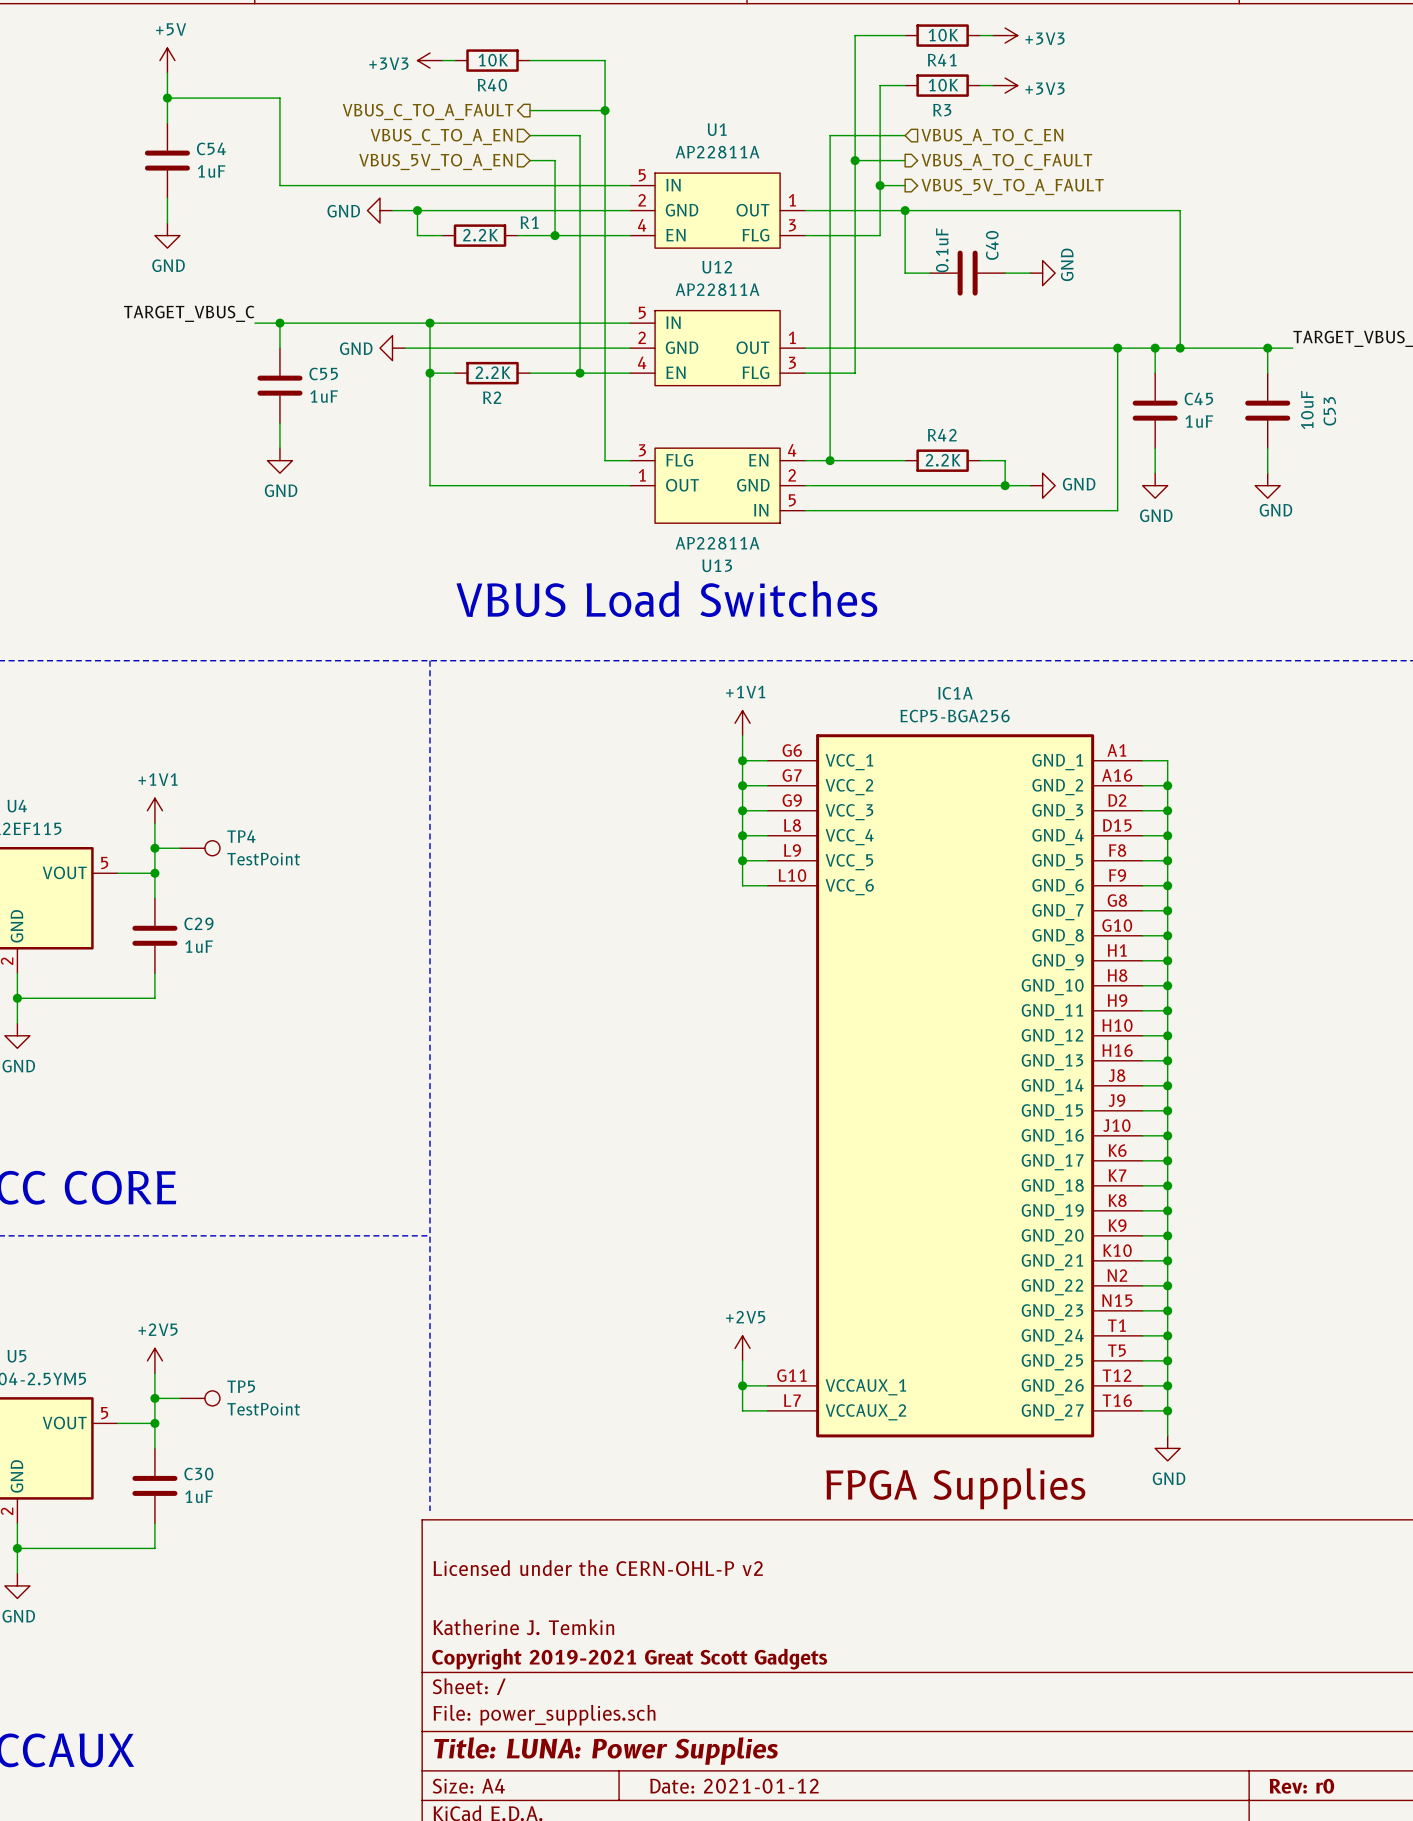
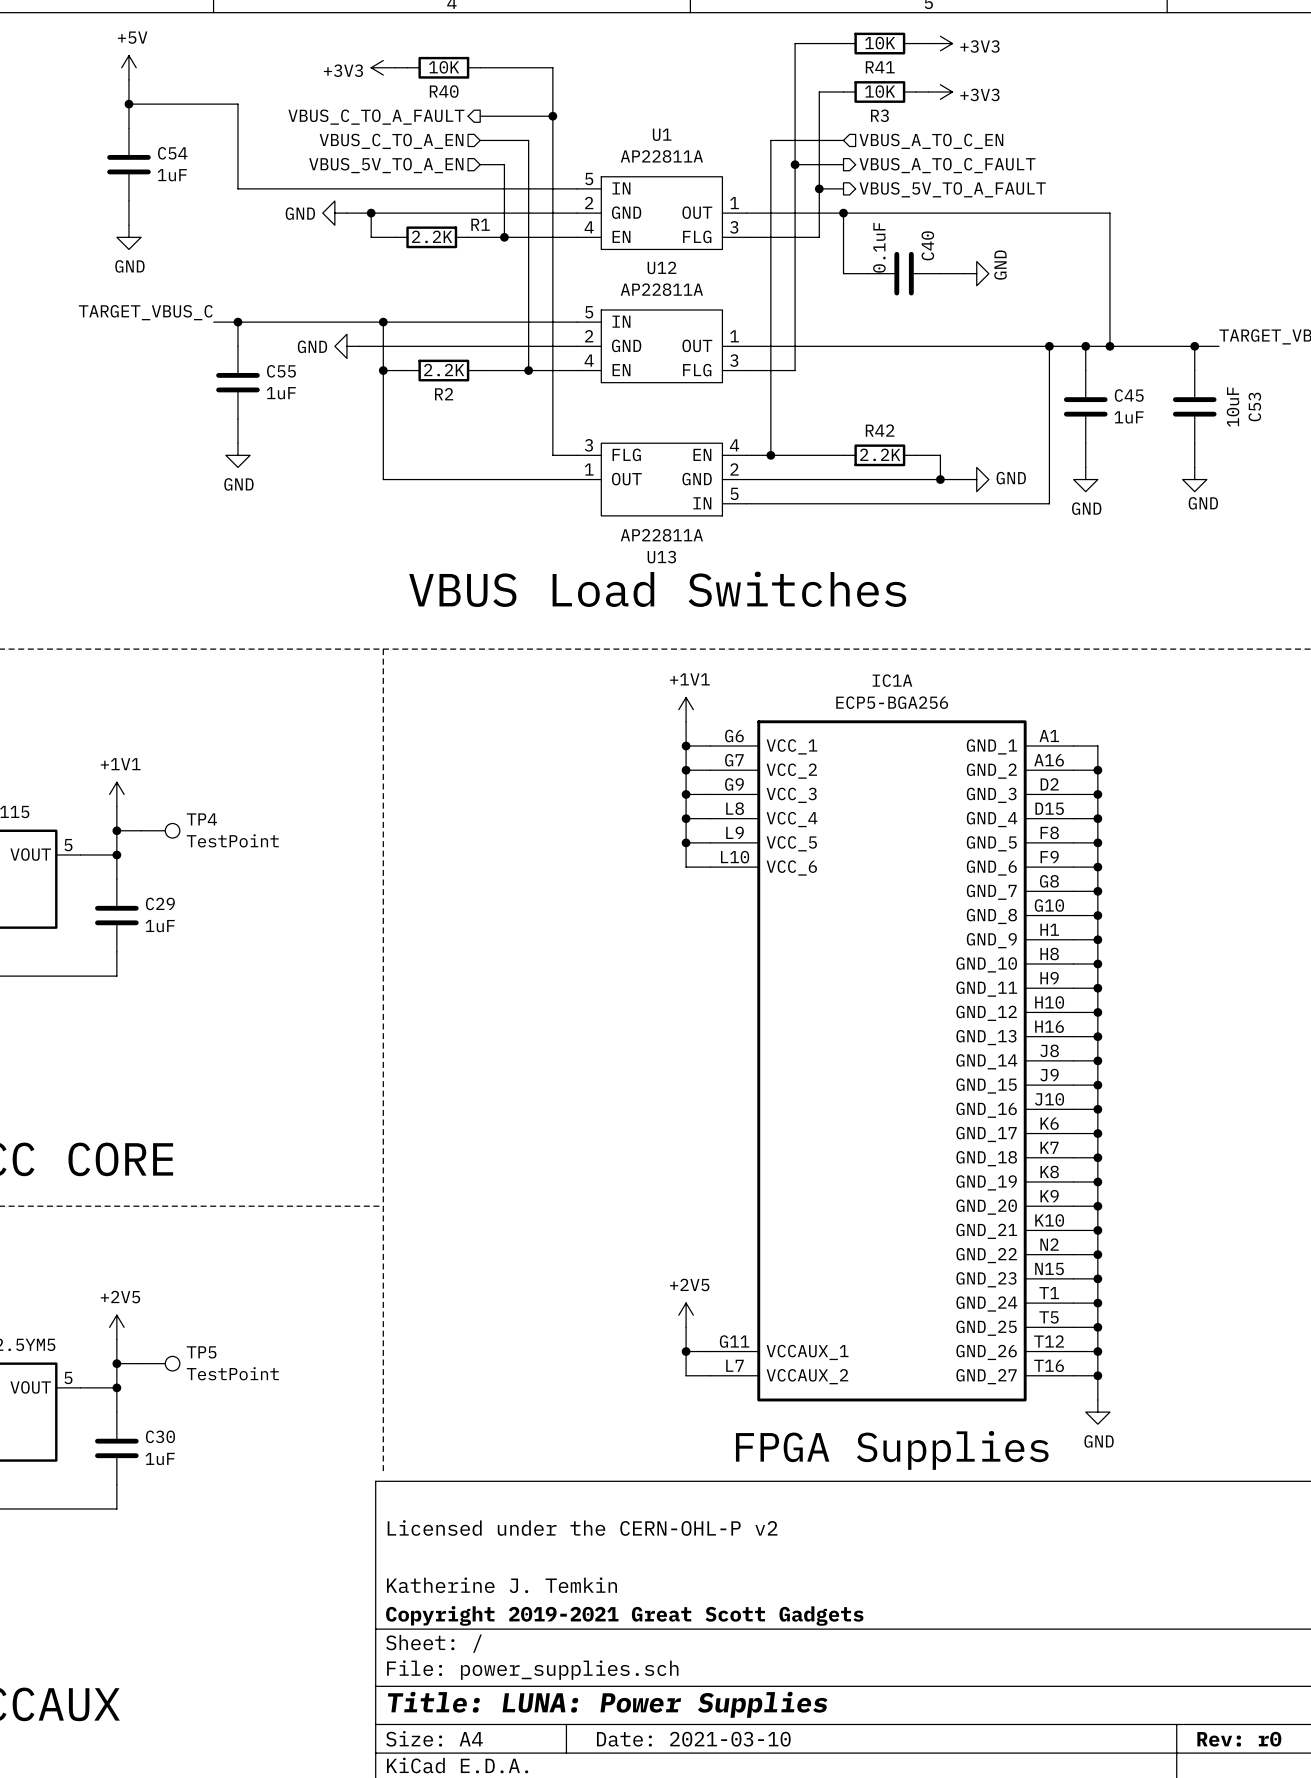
title block: Date: 2021-01-12 (734, 1786) -> Date: 2021-03-10 (693, 1739)

